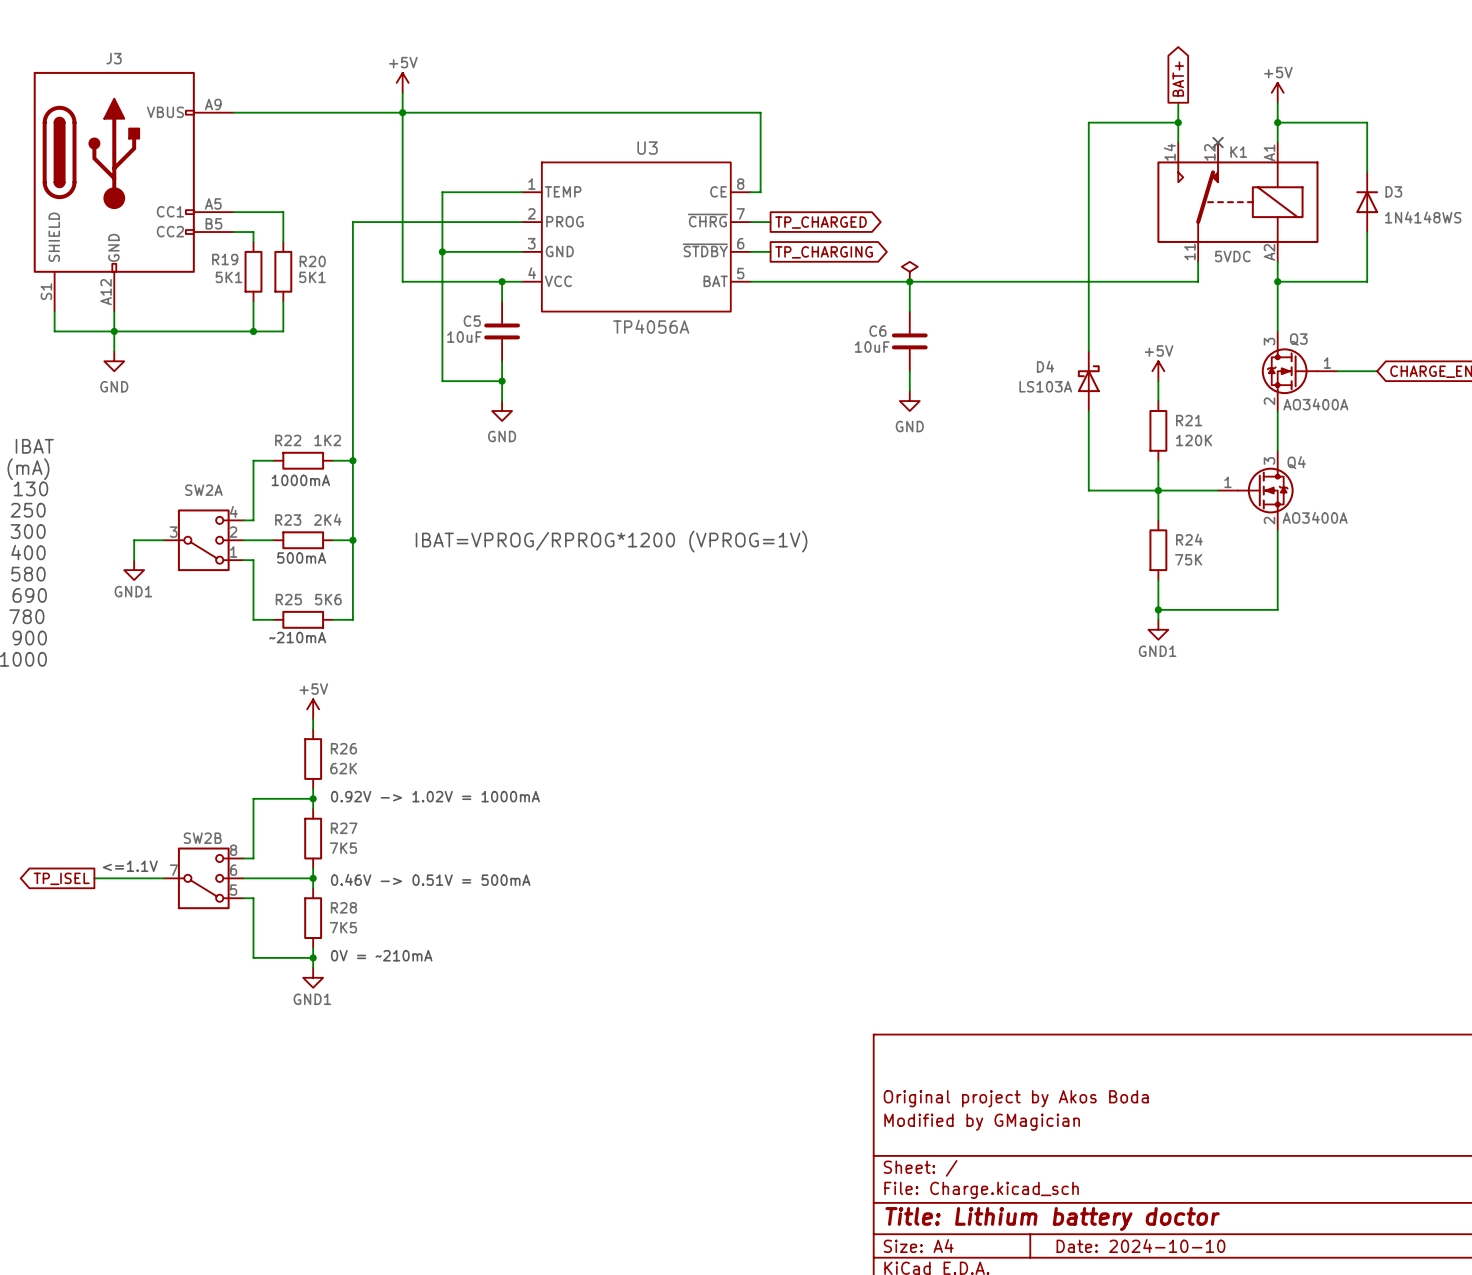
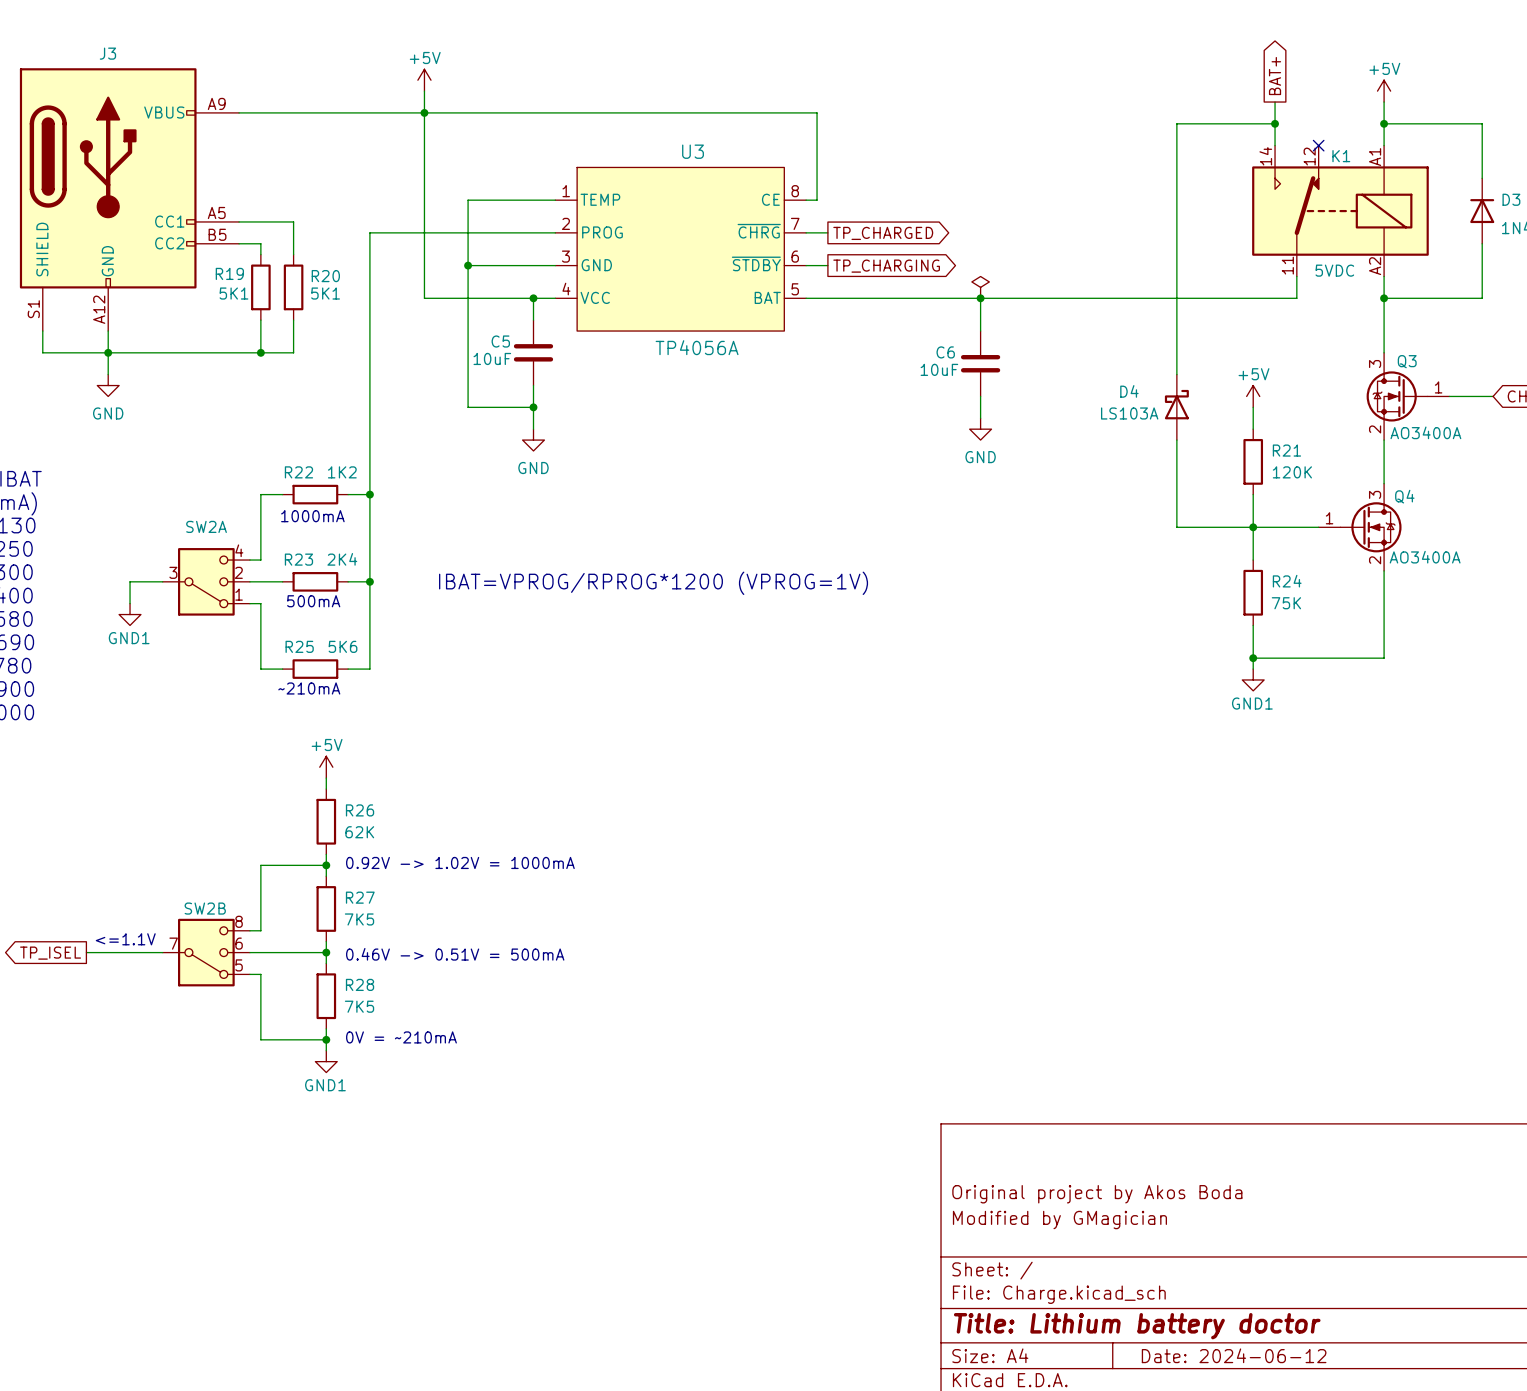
title block: Date: 2024-10-10 (1140, 1246) -> Date: 2024-06-12 (1234, 1355)

